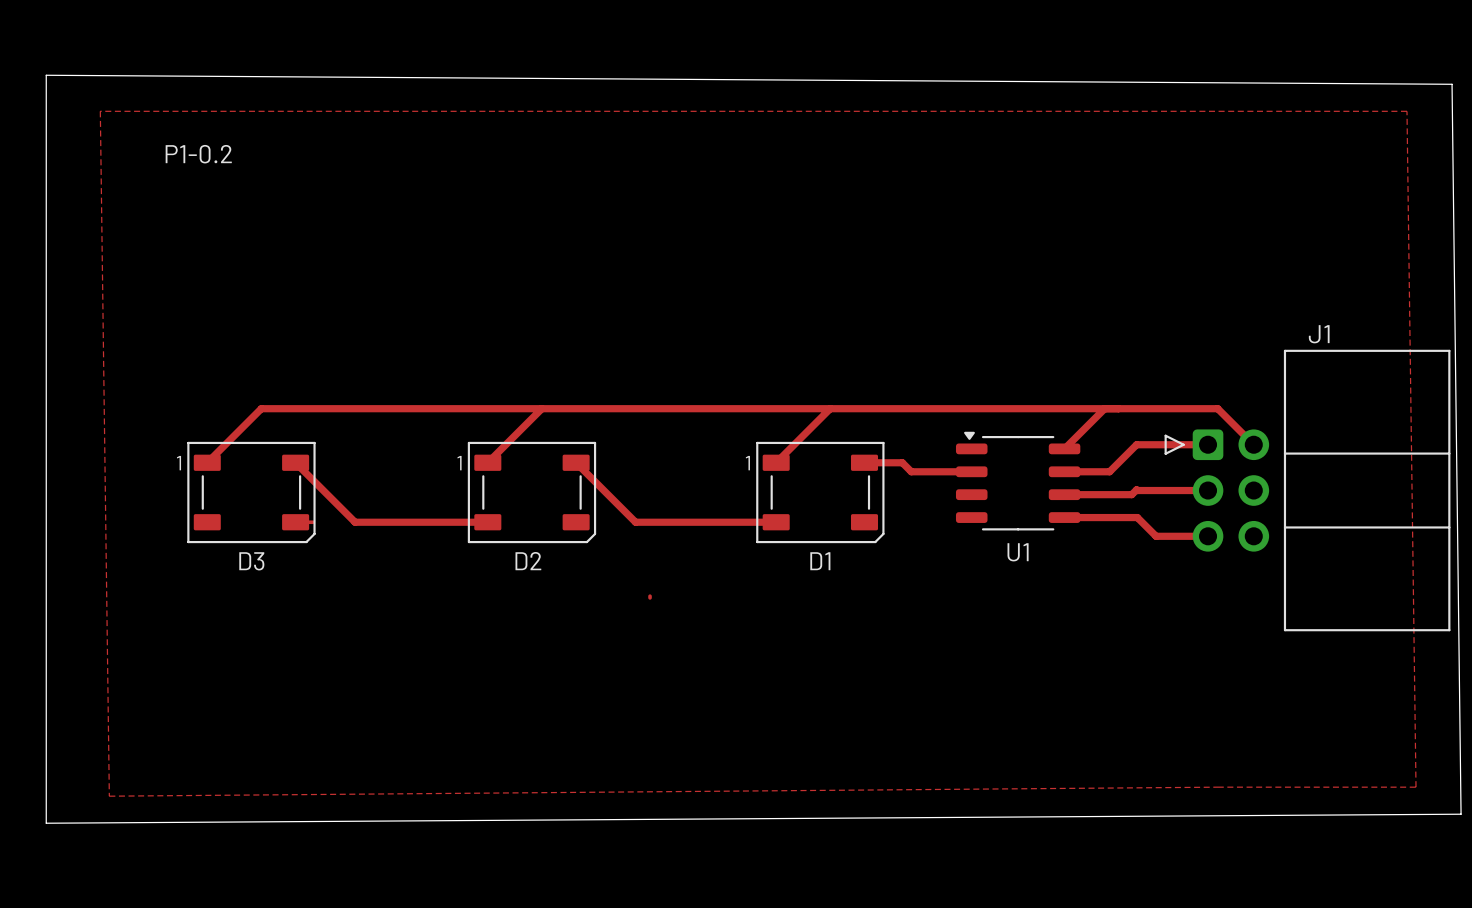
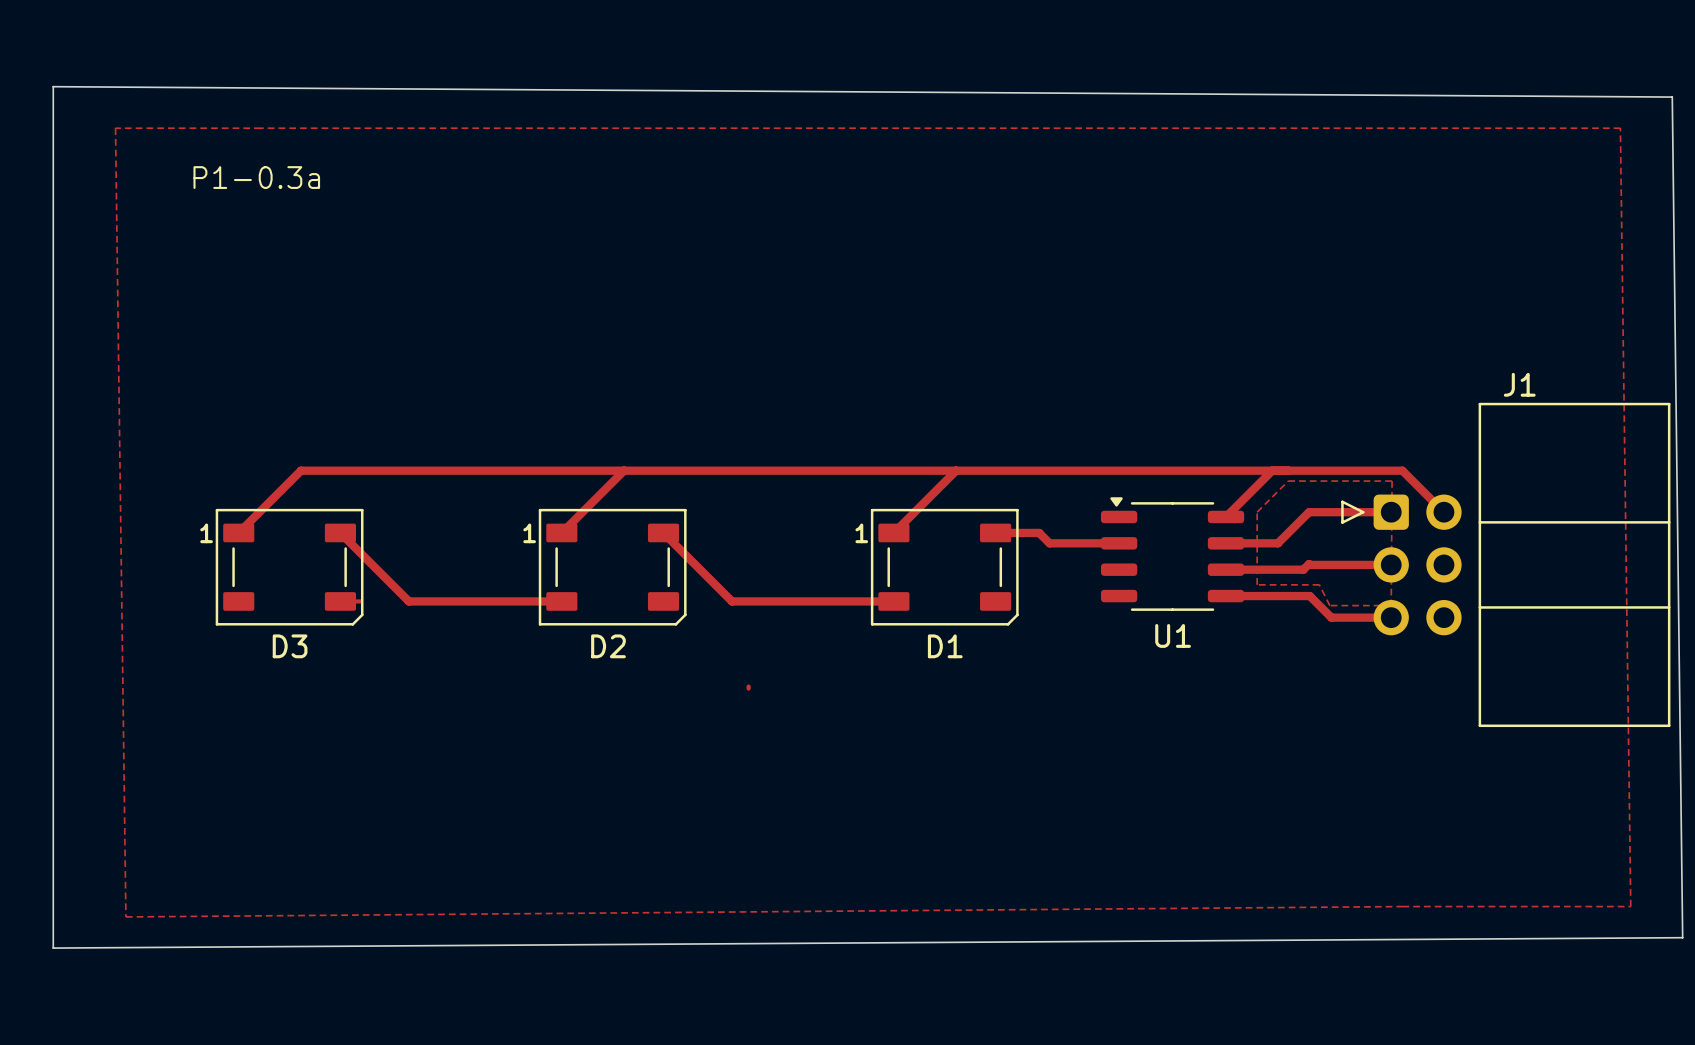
text: P1-0.2 (198, 154) -> P1-0.3a (256, 177)
top zone outline: none -> (1288, 481) (1257, 512) (1257, 584) (1319, 584) (1329, 605) (1391, 605) (1392, 481) (1288, 481)

